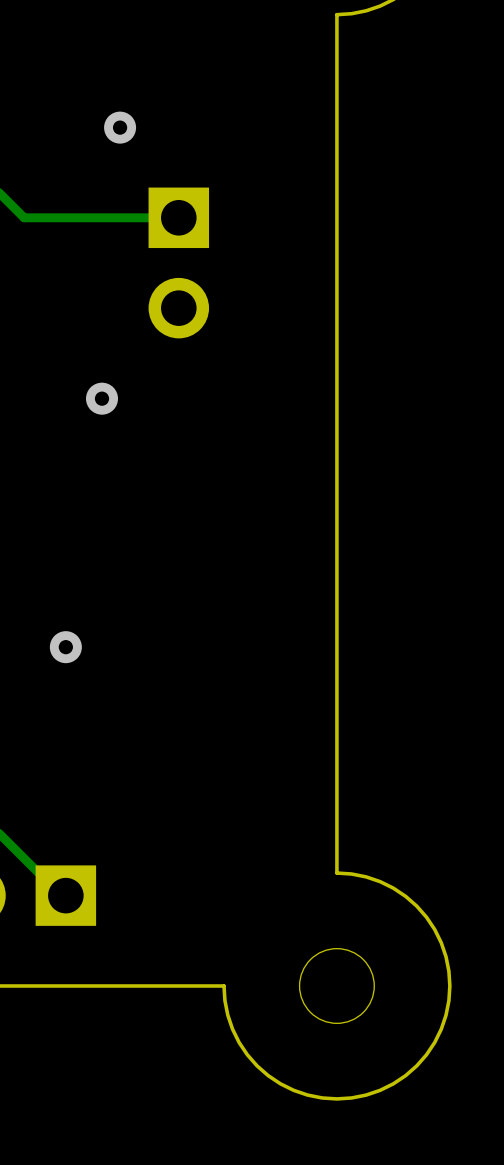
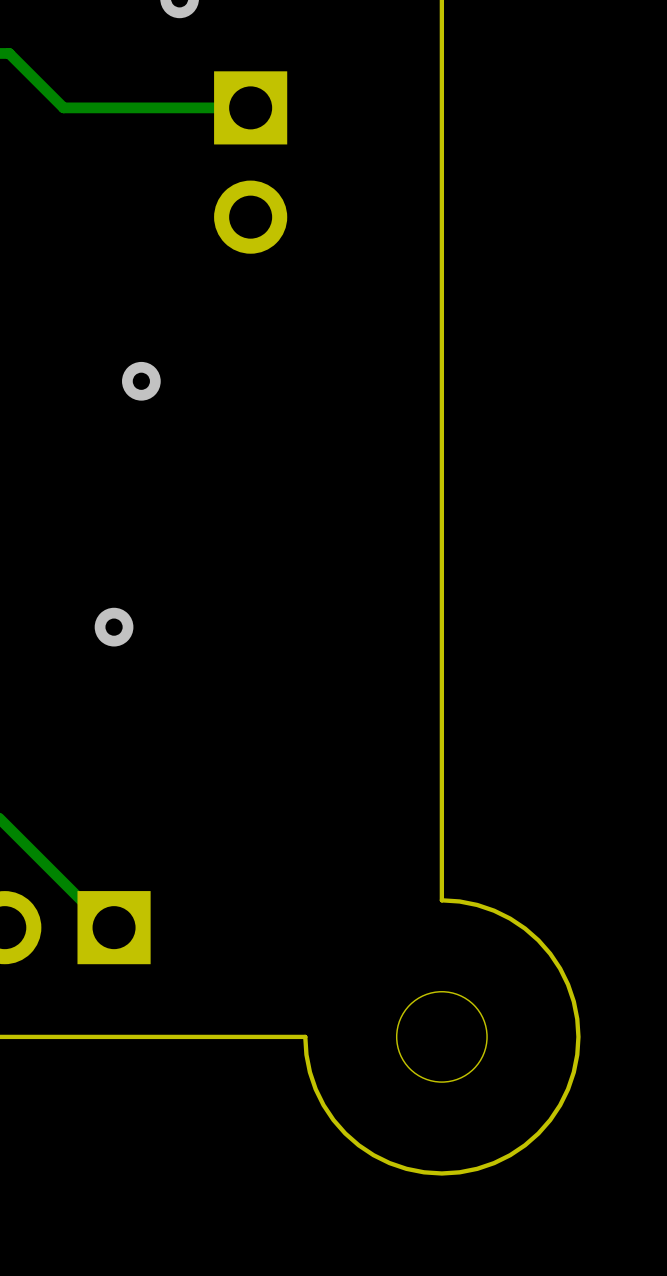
via position: (102, 398) -> (141, 381)

